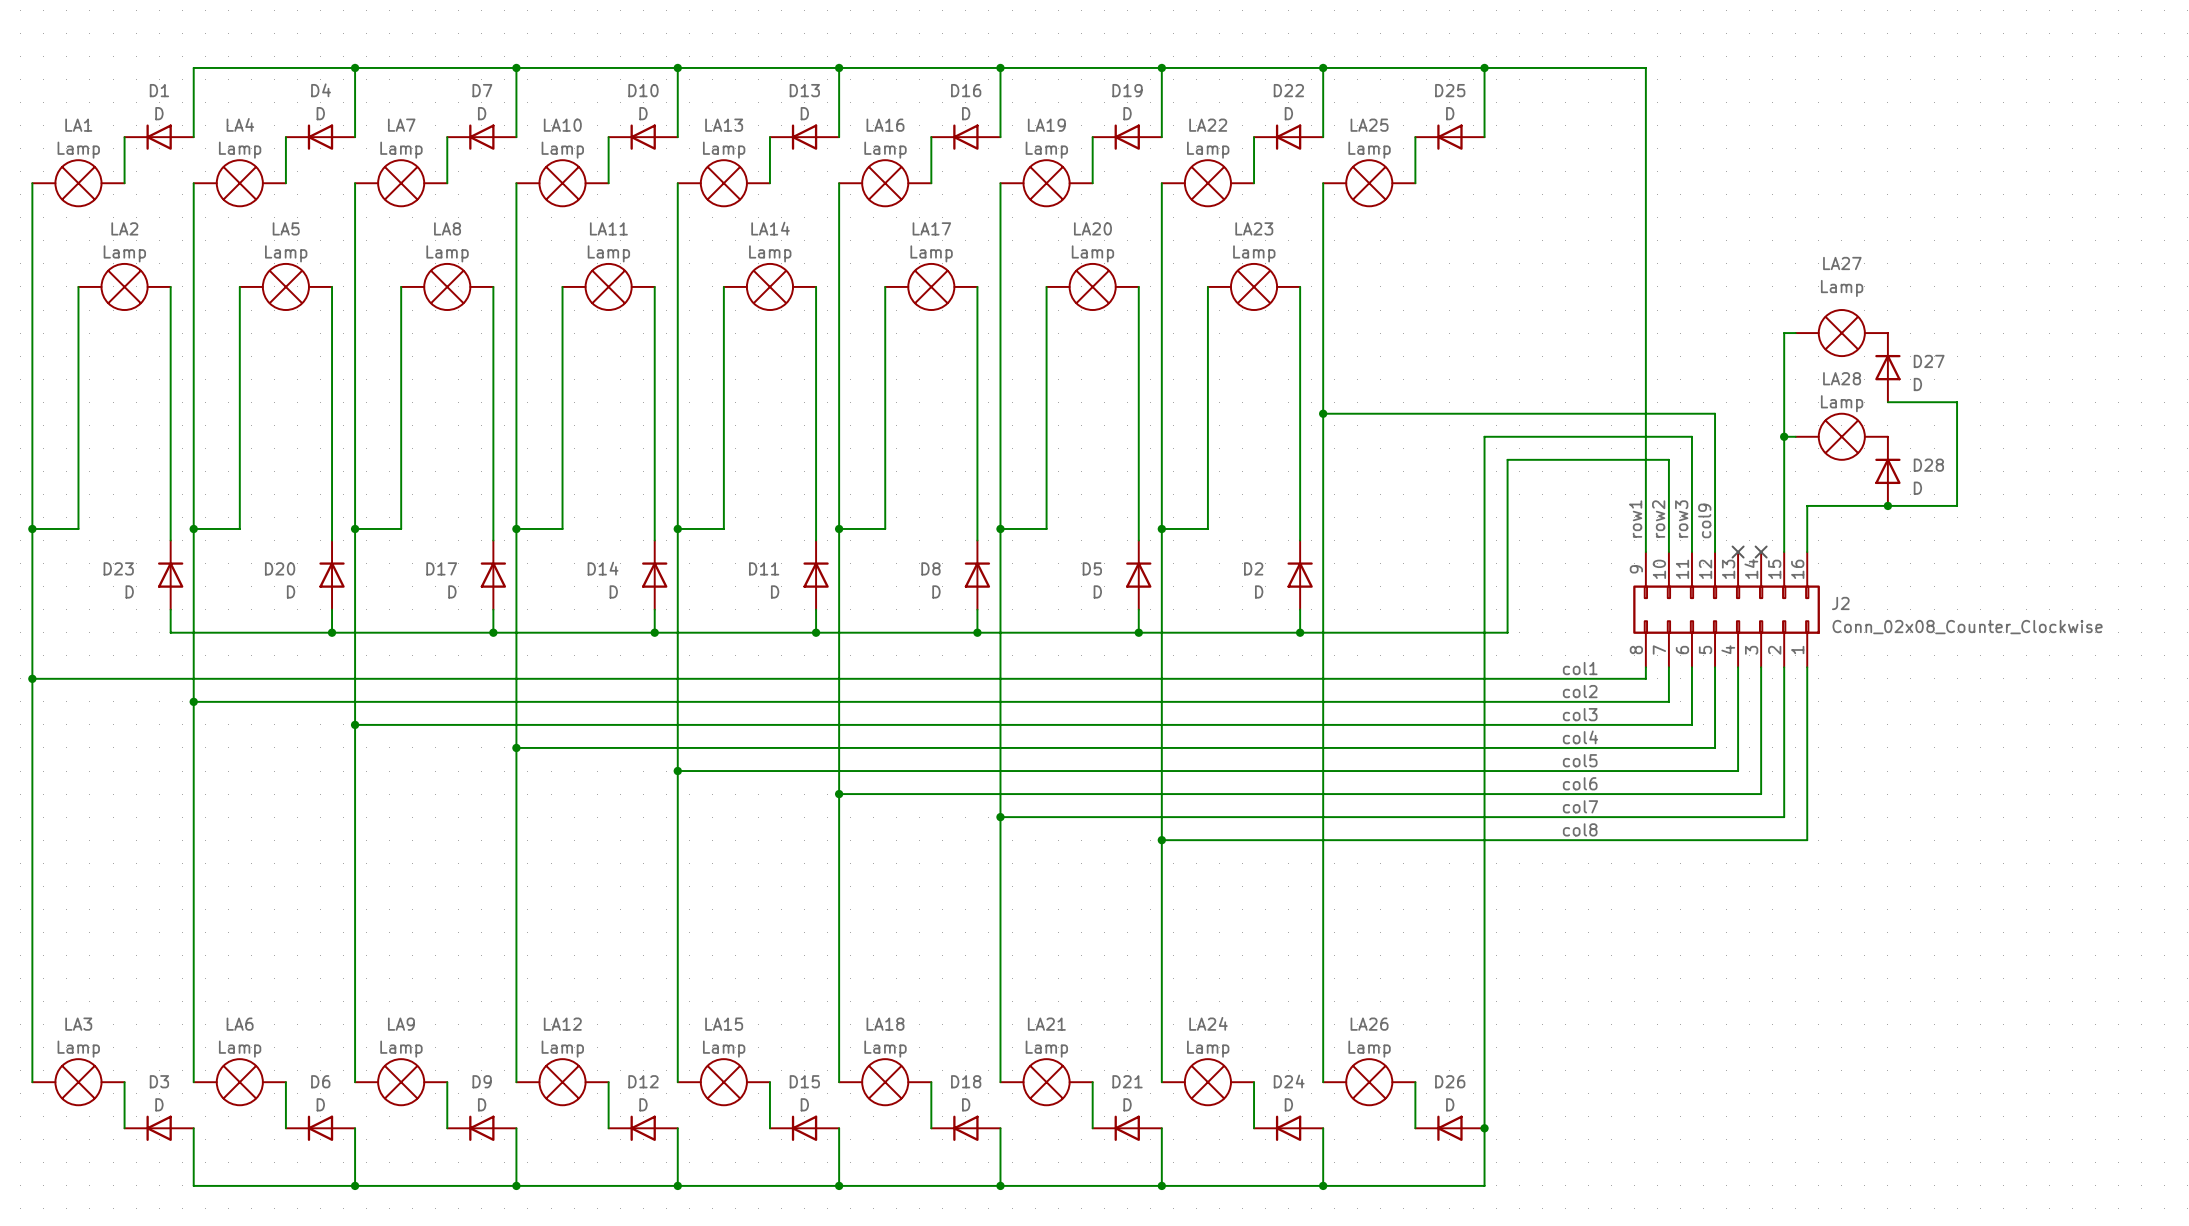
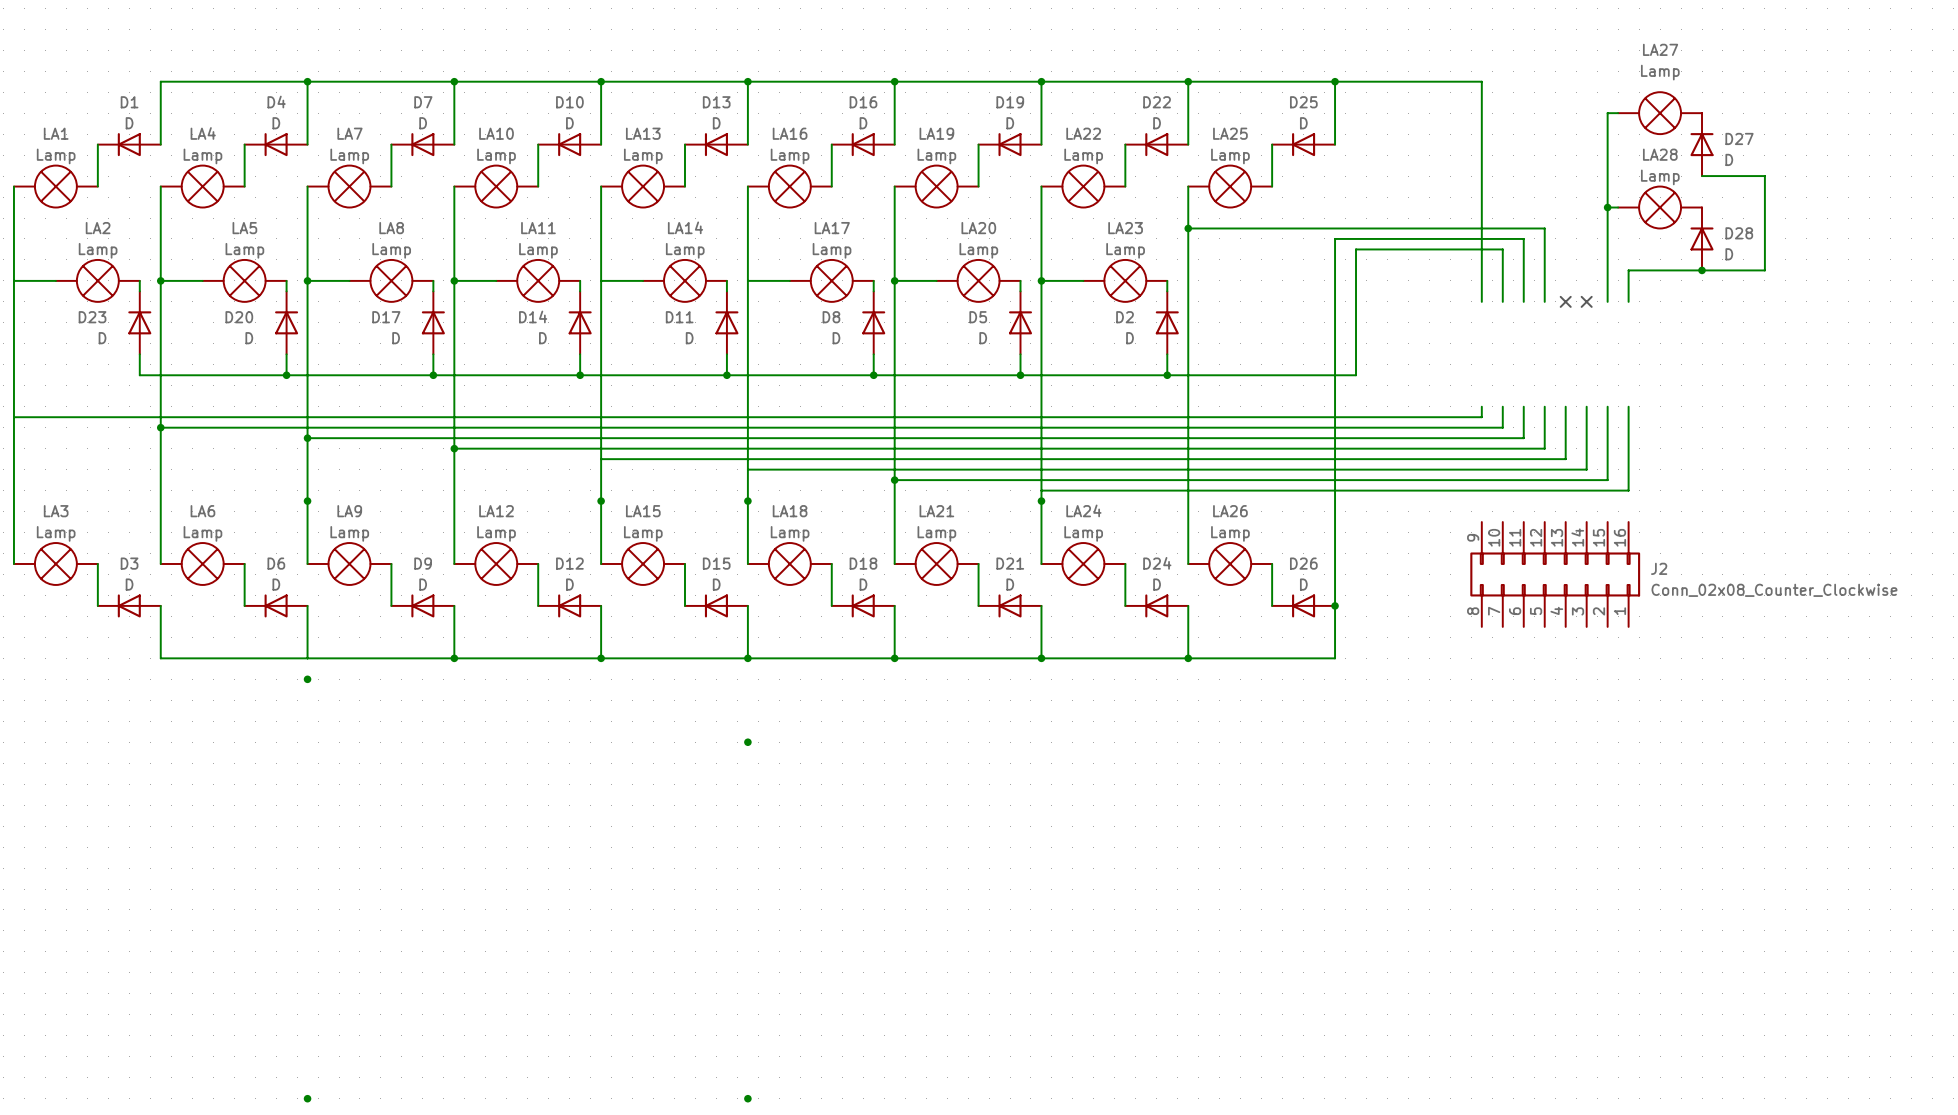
wire: none -> (1618, 113) (1607, 113) (1607, 301)
wire: none -> (1702, 176) (1764, 176) (1764, 270) (1628, 270) (1628, 301)
wire: none -> (1607, 207) (1618, 207)
junction: none -> (1607, 207)
wire: none -> (1188, 228) (1544, 228) (1544, 301)
junction: none -> (1188, 228)
junction: none -> (1702, 270)
wire: (78, 286) (78, 528) (32, 528) -> (55, 280) (13, 280)
junction: none -> (160, 280)
wire: (239, 286) (239, 528) (193, 528) -> (202, 280) (160, 280)
junction: none -> (307, 280)
wire: (401, 286) (401, 528) (355, 528) -> (349, 280) (307, 280)
junction: none -> (454, 280)
wire: (562, 286) (562, 528) (516, 528) -> (496, 280) (454, 280)
wire: (723, 286) (723, 528) (677, 528) -> (643, 280) (601, 280)
wire: (885, 286) (885, 528) (839, 528) -> (789, 280) (747, 280)
junction: none -> (894, 280)
wire: (1046, 286) (1046, 528) (1000, 528) -> (936, 280) (894, 280)
junction: none -> (1041, 280)
wire: (1207, 286) (1207, 528) (1161, 528) -> (1083, 280) (1041, 280)
wire: (1645, 310) (1645, 425) -> none
wire: none -> (1523, 301) (1523, 238) (1335, 238) (1335, 417) (13, 417)
no-connect mark: none -> (1565, 301)
no-connect mark: none -> (1586, 301)
wire: (1795, 333) (1784, 333) (1784, 425) -> none
LA27 position: (1841, 333) -> (1660, 113)
D27 position: (1887, 367) -> (1702, 144)
wire: (170, 390) (170, 540) -> (139, 375) (1356, 375) (1356, 249) (1502, 249) (1502, 301)
wire: (332, 390) (332, 540) -> none
junction: none -> (286, 375)
wire: (493, 390) (493, 540) -> none
junction: none -> (433, 375)
wire: (654, 390) (654, 540) -> none
junction: none -> (580, 375)
wire: (816, 390) (816, 540) -> none
junction: none -> (726, 375)
wire: (977, 390) (977, 540) -> none
junction: none -> (873, 375)
wire: (1138, 390) (1138, 540) -> none
junction: none -> (1020, 375)
wire: (1300, 390) (1300, 540) -> none
wire: (1887, 402) (1957, 402) (1957, 505) (1807, 505) -> (1628, 406) (1628, 480)
wire: (1323, 413) (1715, 413) (1715, 425) -> none
junction position: (1323, 413) -> (1167, 375)
wire: none -> (1502, 406) (1502, 427) (160, 427)
wire: none -> (1565, 406) (1565, 459) (601, 459)
wire: none -> (1586, 406) (1586, 469) (747, 469)
wire: (1691, 436) (1645, 436) (1645, 552) -> (1523, 417) (1523, 406)
wire: (1784, 436) (1795, 436) -> none
junction: (1784, 436) -> none
LA28 position: (1841, 436) -> (1660, 207)
junction: none -> (160, 427)
junction: none -> (307, 438)
wire: (1507, 459) (1507, 632) (170, 632) (170, 609) -> (1356, 438) (307, 438)
wire: (1668, 459) (1668, 552) -> (1502, 438) (1523, 438)
wire: (1691, 459) (1691, 552) -> none
junction: none -> (454, 448)
wire: (1715, 471) (1715, 552) -> (1544, 448) (454, 448)
D28 position: (1887, 471) -> (1702, 238)
wire: (1784, 505) (1784, 552) -> (1607, 480) (894, 480)
junction: (1887, 505) -> none
wire: (1807, 517) (1807, 552) -> (1628, 490) (1041, 490)
label: row1 (1635, 519) -> none
label: row2 (1658, 519) -> none
label: row3 (1681, 519) -> none
label: col9 (1704, 520) -> none
junction: (32, 528) -> none
junction: (193, 528) -> none
junction: (516, 528) -> none
junction position: (1000, 528) -> (894, 480)
no-connect mark: (1738, 552) -> none
no-connect mark: (1761, 552) -> none
D23 position: (170, 575) -> (139, 322)
D20 position: (332, 575) -> (286, 322)
D17 position: (493, 575) -> (433, 322)
D14 position: (654, 575) -> (580, 322)
D11 position: (816, 575) -> (726, 322)
D8 position: (977, 575) -> (873, 322)
D5 position: (1138, 575) -> (1020, 322)
D2 position: (1300, 575) -> (1167, 322)
wire: (32, 598) (32, 1082) -> none
wire: (193, 598) (193, 644) -> (97, 563) (97, 605)
wire: (355, 598) (355, 644) -> (244, 563) (244, 605)
wire: (516, 598) (516, 644) -> (391, 563) (391, 605)
wire: (677, 598) (677, 644) -> (538, 563) (538, 605)
wire: (839, 598) (839, 644) -> (684, 563) (684, 605)
wire: (1000, 598) (1000, 644) -> (831, 563) (831, 605)
wire: (1161, 598) (1161, 644) -> (978, 563) (978, 605)
wire: (1323, 598) (1323, 644) -> (1125, 563) (1125, 605)
wire: none -> (1272, 563) (1272, 605)
wire: (332, 609) (332, 632) -> none
wire: (493, 609) (493, 632) -> none
wire: (654, 609) (654, 632) -> none
wire: (816, 609) (816, 632) -> none
wire: (977, 609) (977, 632) -> none
wire: (1138, 609) (1138, 632) -> none
wire: (1300, 609) (1300, 632) -> none
junction: (332, 632) -> none
junction: (493, 632) -> none
junction: (654, 632) -> none
junction: (816, 632) -> none
junction: (977, 632) -> none
junction: (1138, 632) -> none
junction: (1300, 632) -> none
junction: none -> (1335, 605)
wire: (1645, 667) (1645, 678) (32, 678) -> none
wire: (1668, 667) (1668, 701) (1484, 701) (1484, 1185) (193, 1185) (193, 1128) -> none
wire: (1691, 667) (1691, 724) (355, 724) -> none
wire: (1715, 667) (1715, 747) (516, 747) -> none
wire: (1738, 667) (1738, 771) (677, 771) -> none
wire: (1761, 667) (1761, 794) (839, 794) -> none
wire: (1784, 667) (1784, 817) (1000, 817) -> none
wire: (1807, 667) (1807, 840) (1161, 840) -> none
label: col1 (1580, 668) -> none
junction: (32, 678) -> none
label: col2 (1580, 691) -> none
wire: (193, 701) (193, 1082) -> none
junction: (193, 701) -> none
wire: (355, 701) (355, 1082) -> none
wire: (516, 701) (516, 1082) -> none
junction: none -> (454, 658)
wire: (677, 701) (677, 1082) -> none
junction: none -> (601, 658)
wire: (839, 701) (839, 1082) -> none
junction: none -> (747, 658)
wire: (1000, 701) (1000, 1082) -> none
junction: none -> (894, 658)
wire: (1161, 701) (1161, 1082) -> none
junction: none -> (1041, 658)
wire: (1323, 701) (1323, 1082) -> none
junction: none -> (1188, 658)
label: col3 (1580, 714) -> none
label: col4 (1580, 737) -> none
junction: (516, 747) -> none
label: col5 (1580, 760) -> none
junction: (677, 771) -> none
label: col6 (1580, 783) -> none
label: col7 (1580, 806) -> none
junction: (1000, 817) -> none
label: col8 (1580, 829) -> none
junction: (1161, 840) -> none
LA3 position: (78, 1082) -> (55, 563)
wire: (124, 1082) (124, 1128) -> none
LA6 position: (239, 1082) -> (202, 563)
wire: (285, 1082) (285, 1128) -> none
LA9 position: (401, 1082) -> (349, 563)
wire: (447, 1082) (447, 1128) -> none
LA12 position: (562, 1082) -> (496, 563)
wire: (608, 1082) (608, 1128) -> none
LA15 position: (723, 1082) -> (643, 563)
wire: (769, 1082) (769, 1128) -> none
LA18 position: (885, 1082) -> (789, 563)
wire: (931, 1082) (931, 1128) -> none
LA21 position: (1046, 1082) -> (936, 563)
wire: (1092, 1082) (1092, 1128) -> none
LA24 position: (1207, 1082) -> (1083, 563)
wire: (1254, 1082) (1254, 1128) -> none
LA26 position: (1369, 1082) -> (1230, 563)
wire: (1415, 1082) (1415, 1128) -> none
D3 position: (159, 1128) -> (129, 605)
D6 position: (320, 1128) -> (276, 605)
wire: (355, 1128) (355, 1185) -> none
D9 position: (481, 1128) -> (422, 605)
wire: (516, 1128) (516, 1185) -> none
D12 position: (643, 1128) -> (569, 605)
wire: (677, 1128) (677, 1185) -> none
D15 position: (804, 1128) -> (716, 605)
wire: (839, 1128) (839, 1185) -> none
D18 position: (965, 1128) -> (863, 605)
wire: (1000, 1128) (1000, 1185) -> none
D21 position: (1127, 1128) -> (1010, 605)
wire: (1161, 1128) (1161, 1185) -> none
D24 position: (1288, 1128) -> (1156, 605)
wire: (1323, 1128) (1323, 1185) -> none
D26 position: (1449, 1128) -> (1303, 605)
junction: (1484, 1128) -> none
junction: (516, 1185) -> none
junction: (677, 1185) -> none
junction: (1000, 1185) -> none
junction: (1161, 1185) -> none
junction: (1323, 1185) -> none

